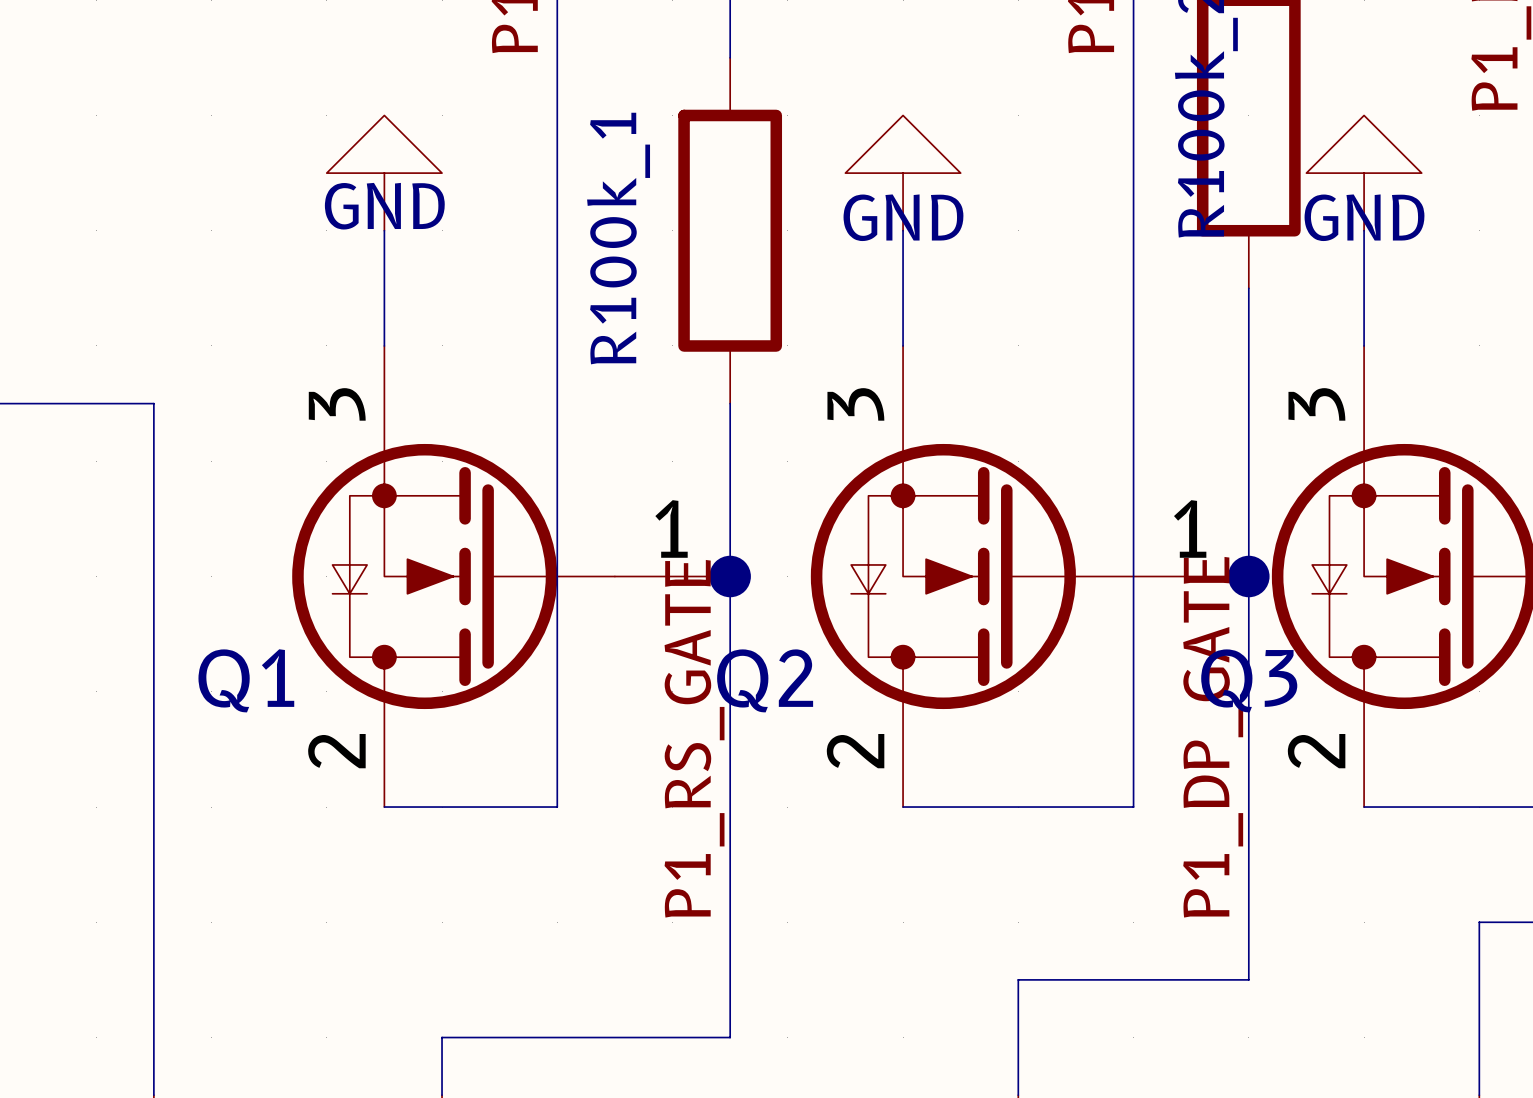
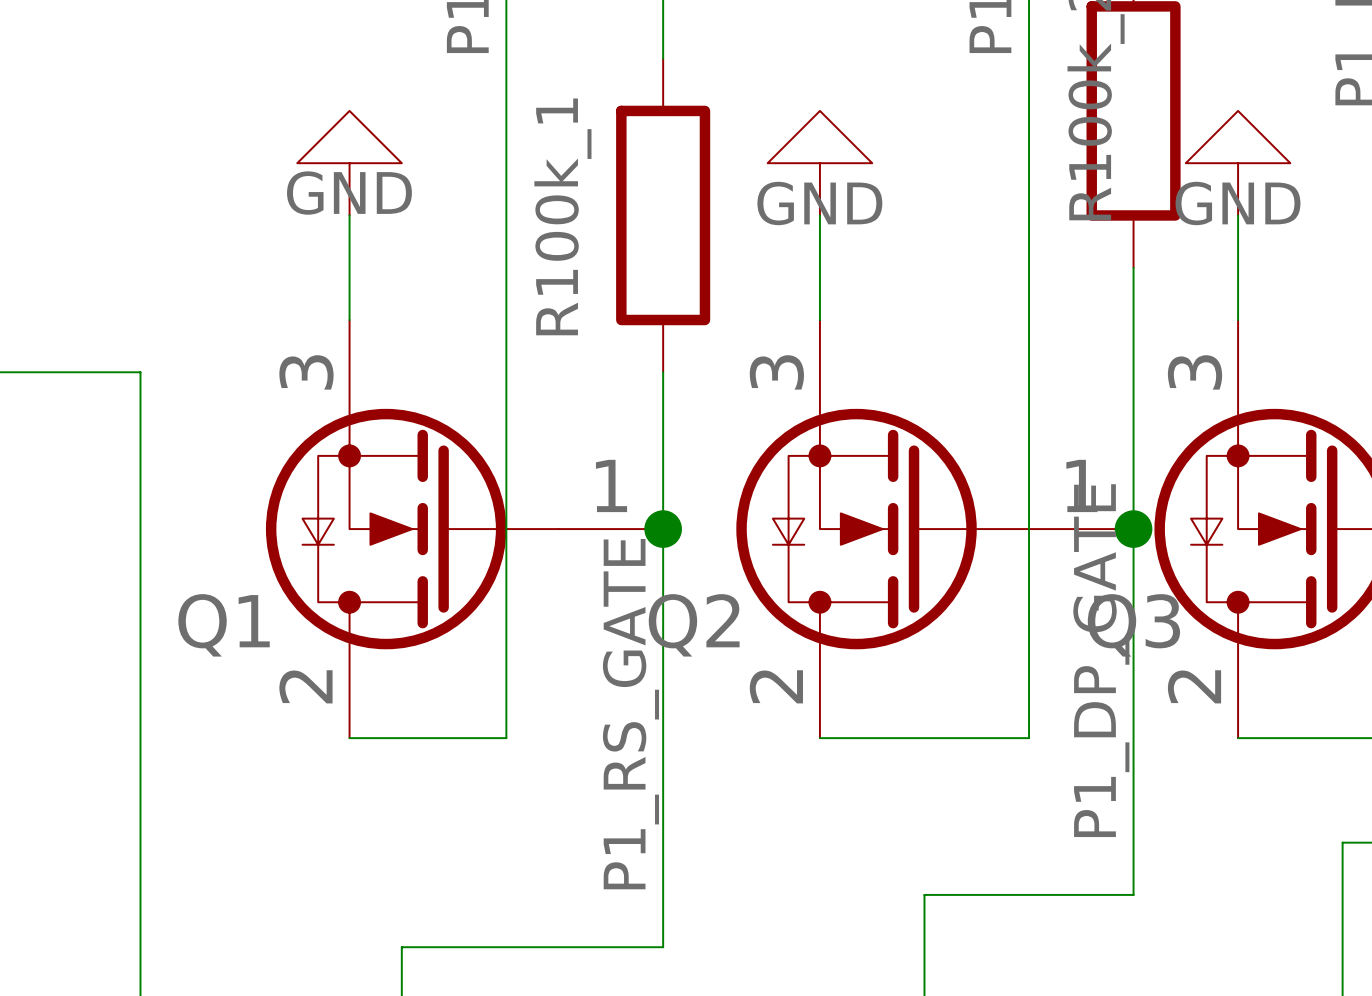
label position: P1_RS_GATE (694, 738) -> P1_RS_GATE (630, 714)

